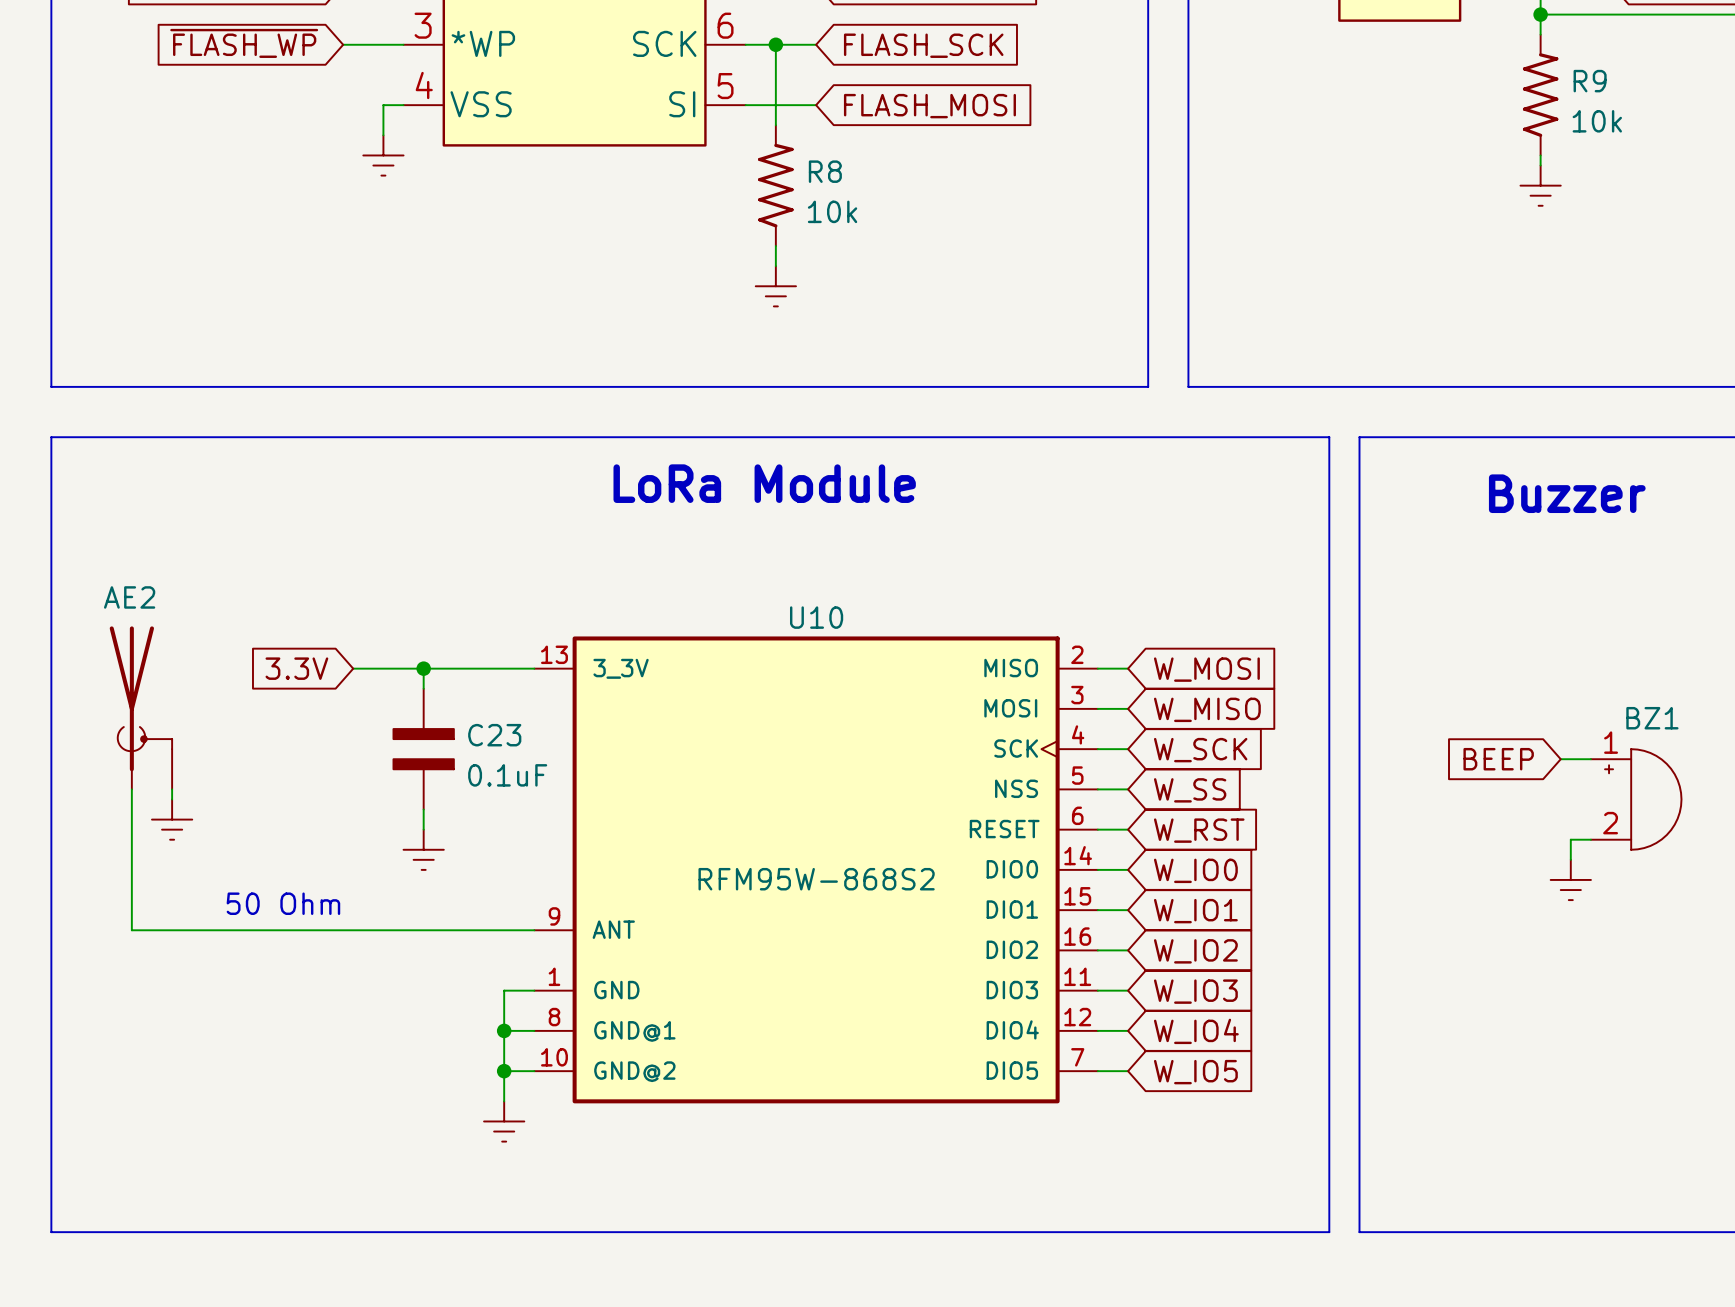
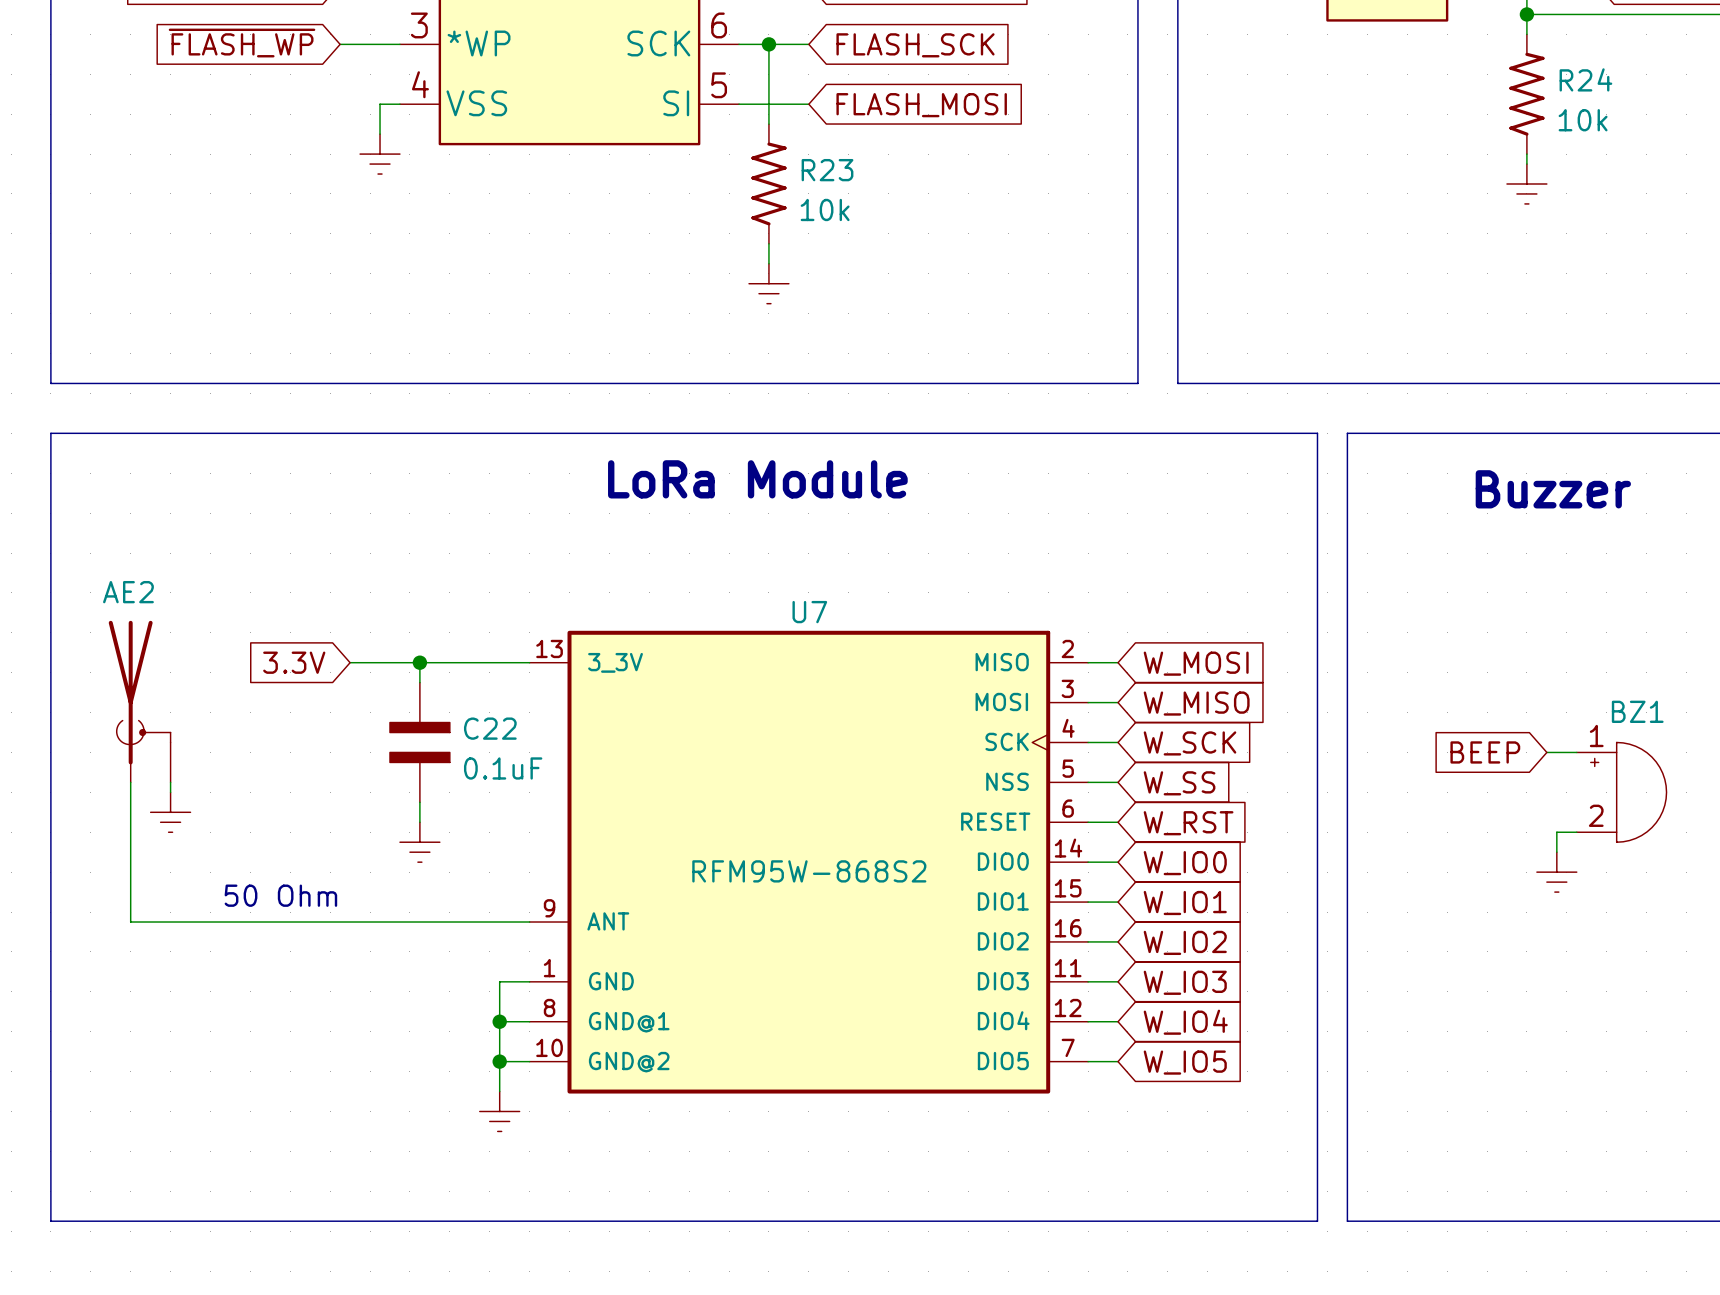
R9 name: R9 (1590, 81) -> R24 (1585, 79)
R8 name: R8 (825, 171) -> R23 (827, 170)
U10 name: U10 (816, 617) -> U7 (809, 612)
C23 name: C23 (494, 735) -> C22 (490, 728)

